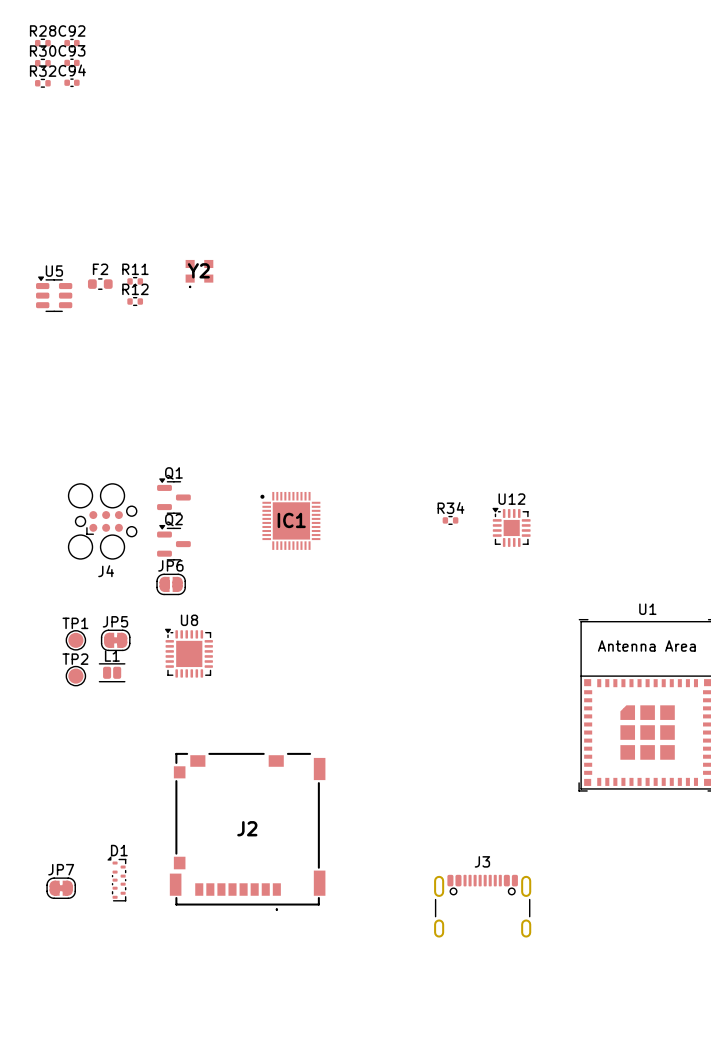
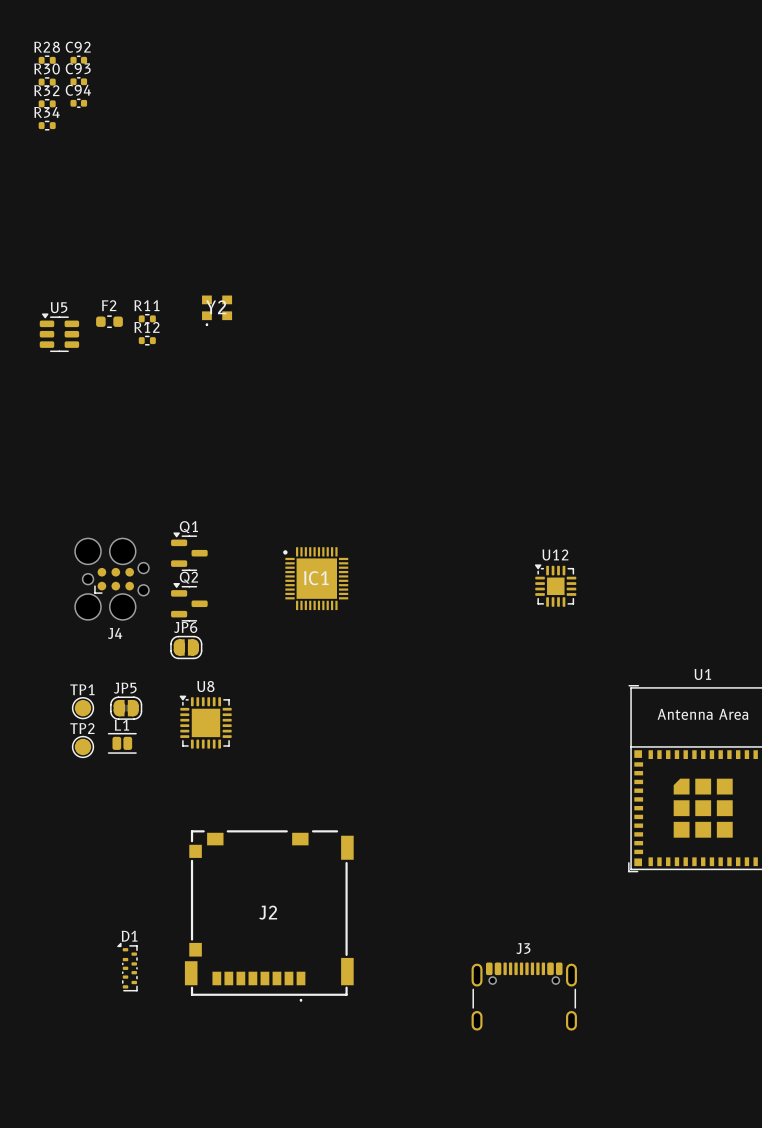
R34 position: (450, 520) -> (47, 125)
JP7: (61, 888) -> none

